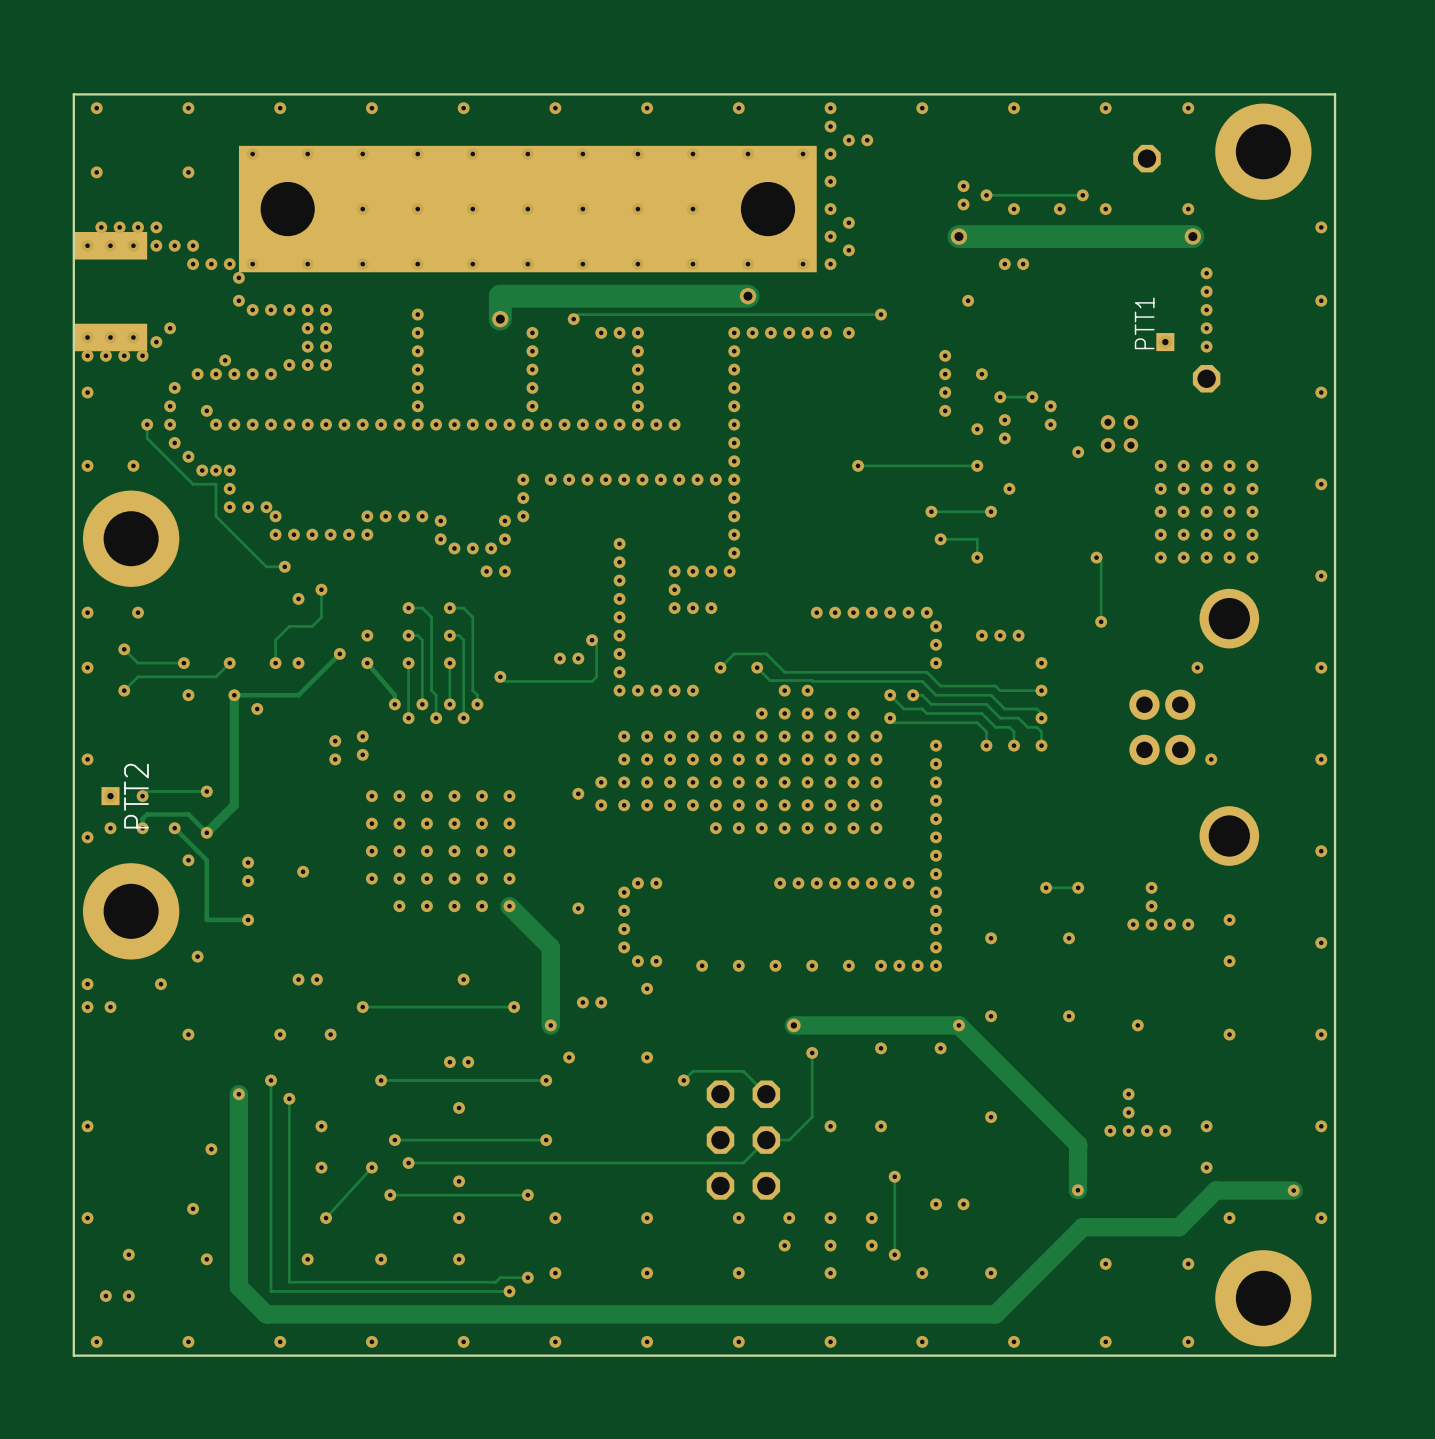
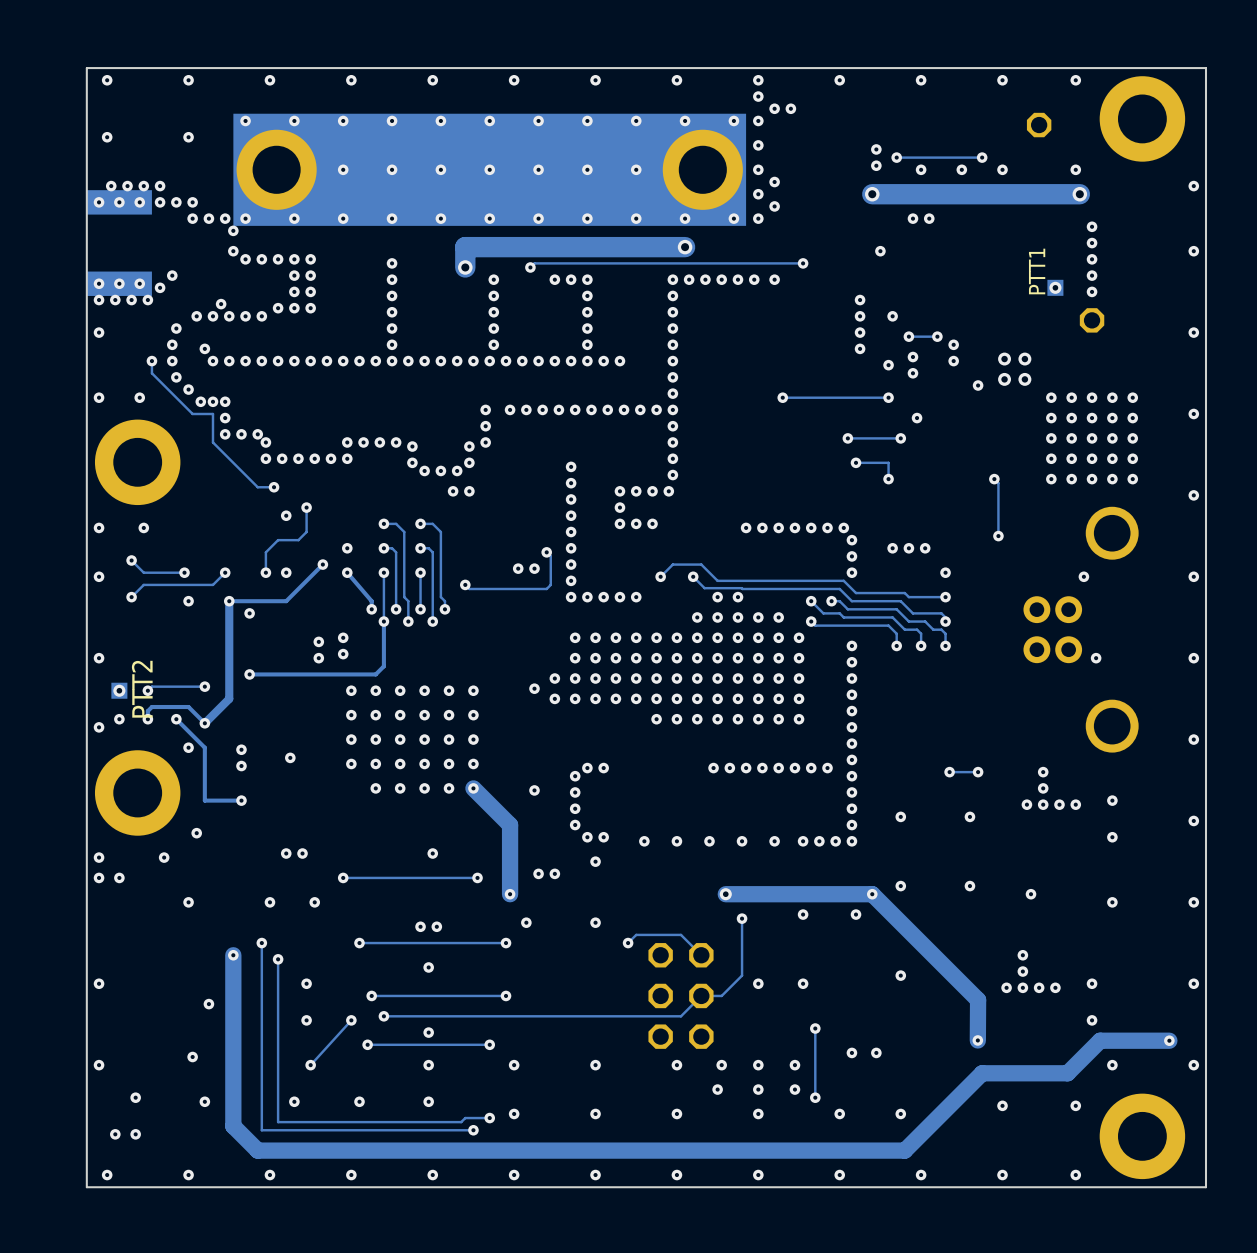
track: none -> (383, 621) (383, 666) (375, 674) (249, 674)
via: none -> (249, 674)

